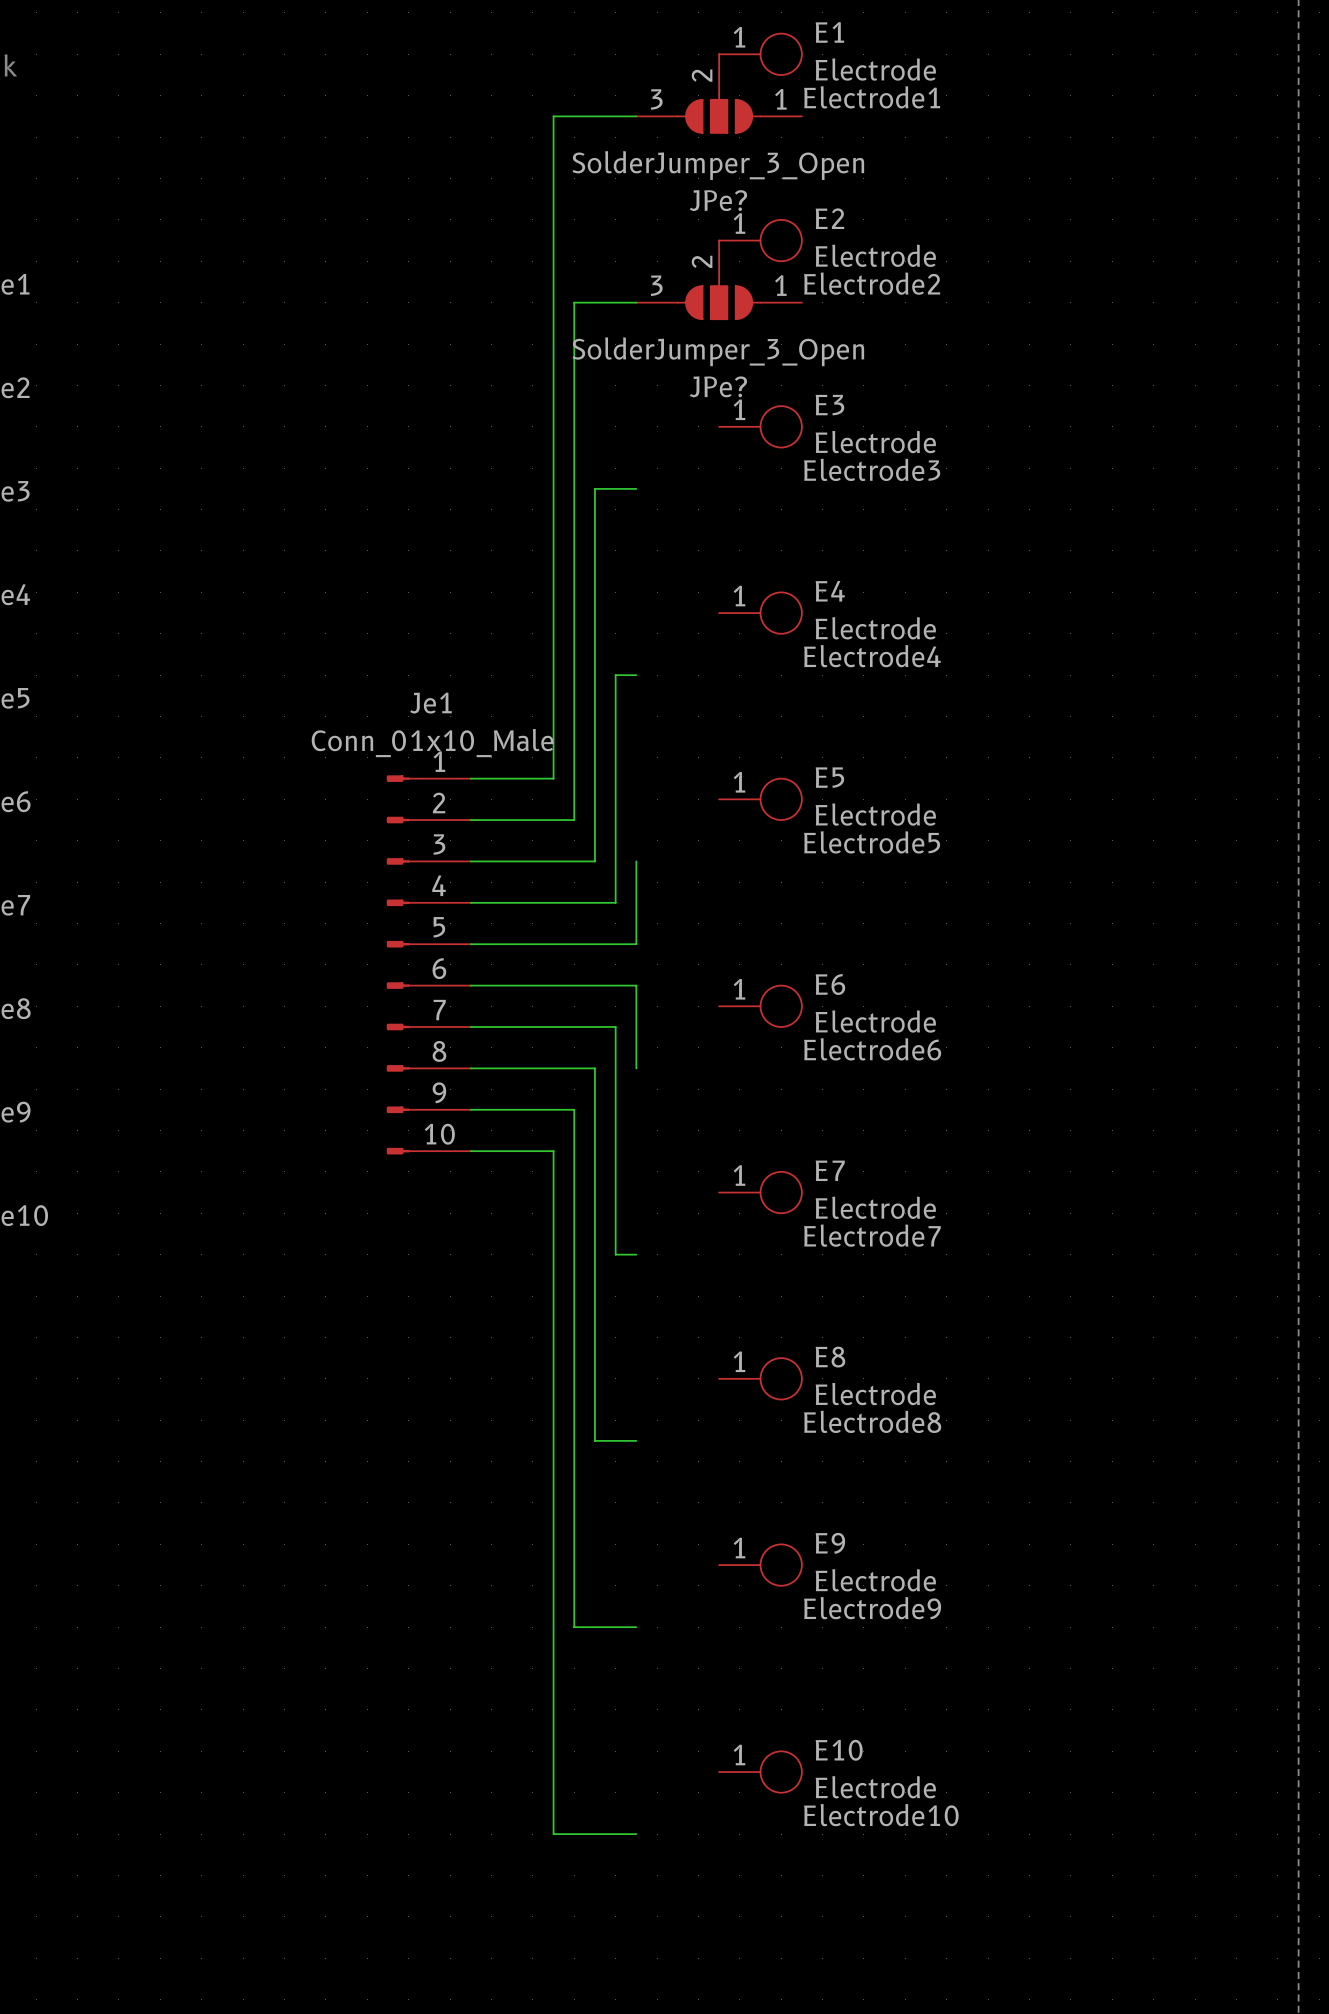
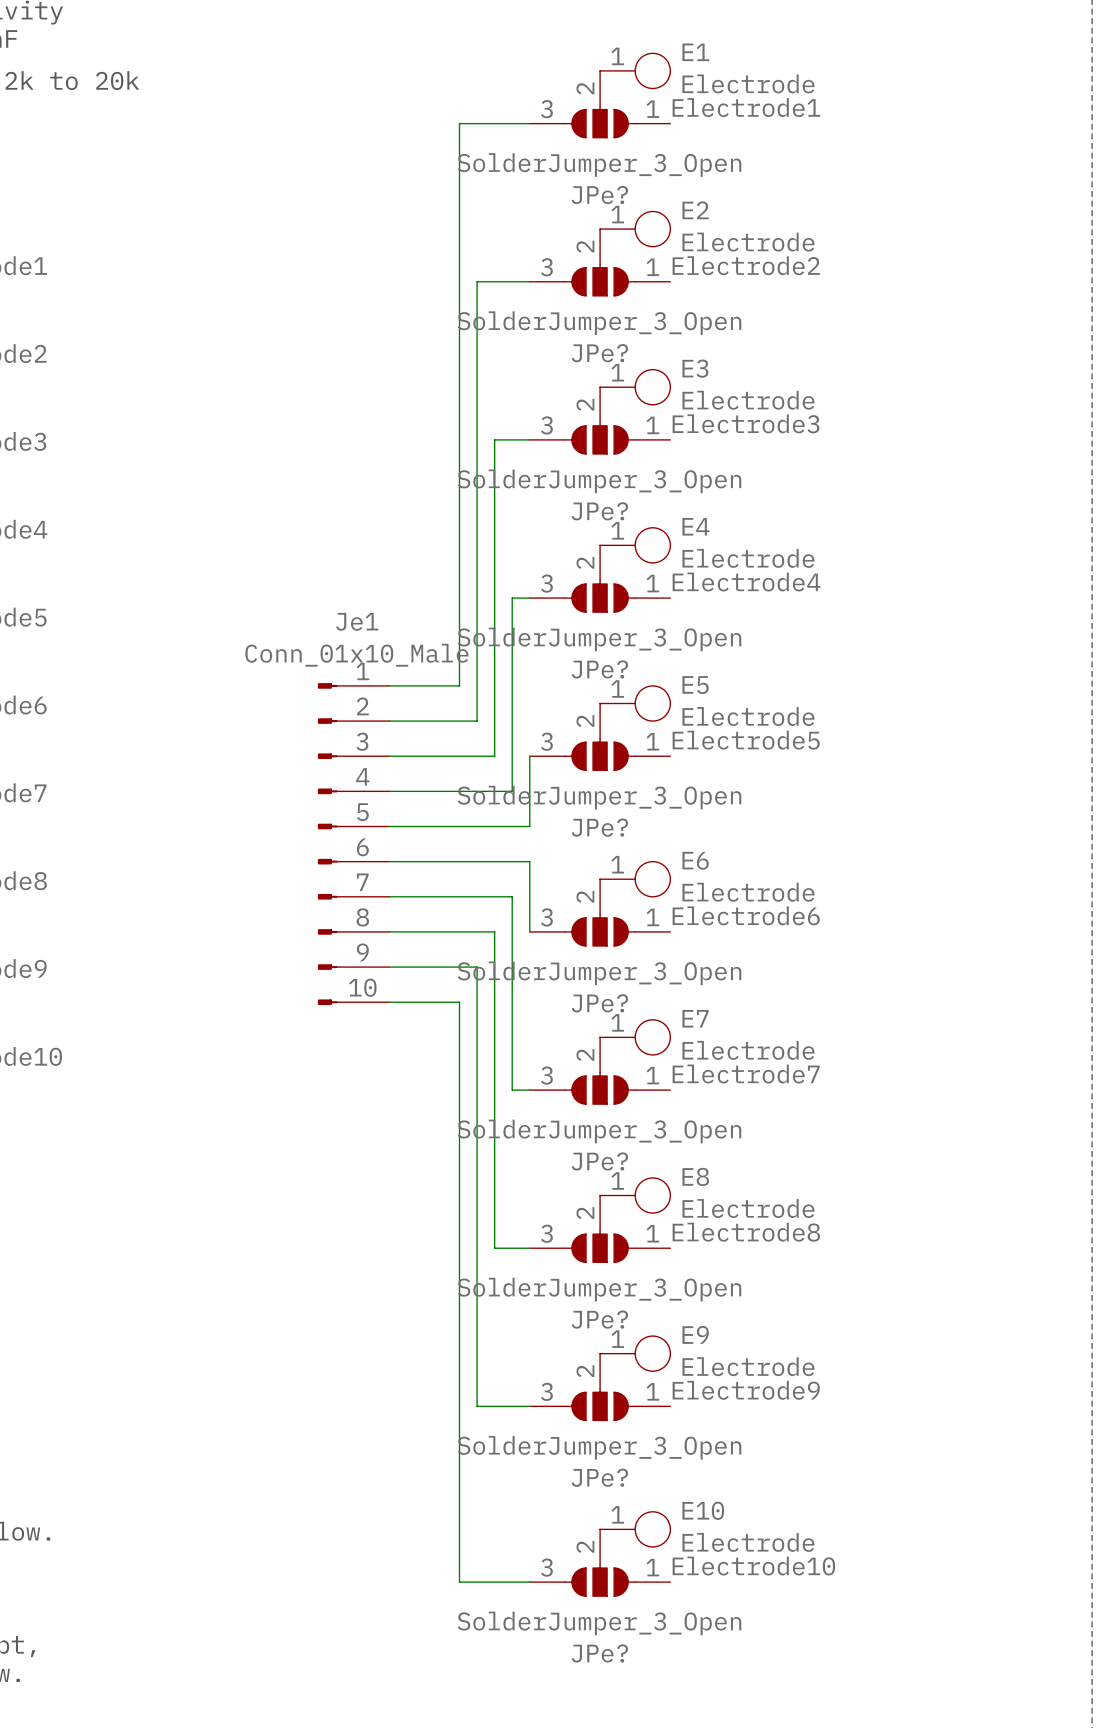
JPe?: none -> SolderJumper_3_Open (600, 420)
JPe?: none -> SolderJumper_3_Open (600, 578)
JPe?: none -> SolderJumper_3_Open (600, 736)
JPe?: none -> SolderJumper_3_Open (600, 912)
JPe?: none -> SolderJumper_3_Open (600, 1070)
JPe?: none -> SolderJumper_3_Open (600, 1228)
JPe?: none -> SolderJumper_3_Open (600, 1387)
JPe?: none -> SolderJumper_3_Open (600, 1562)

